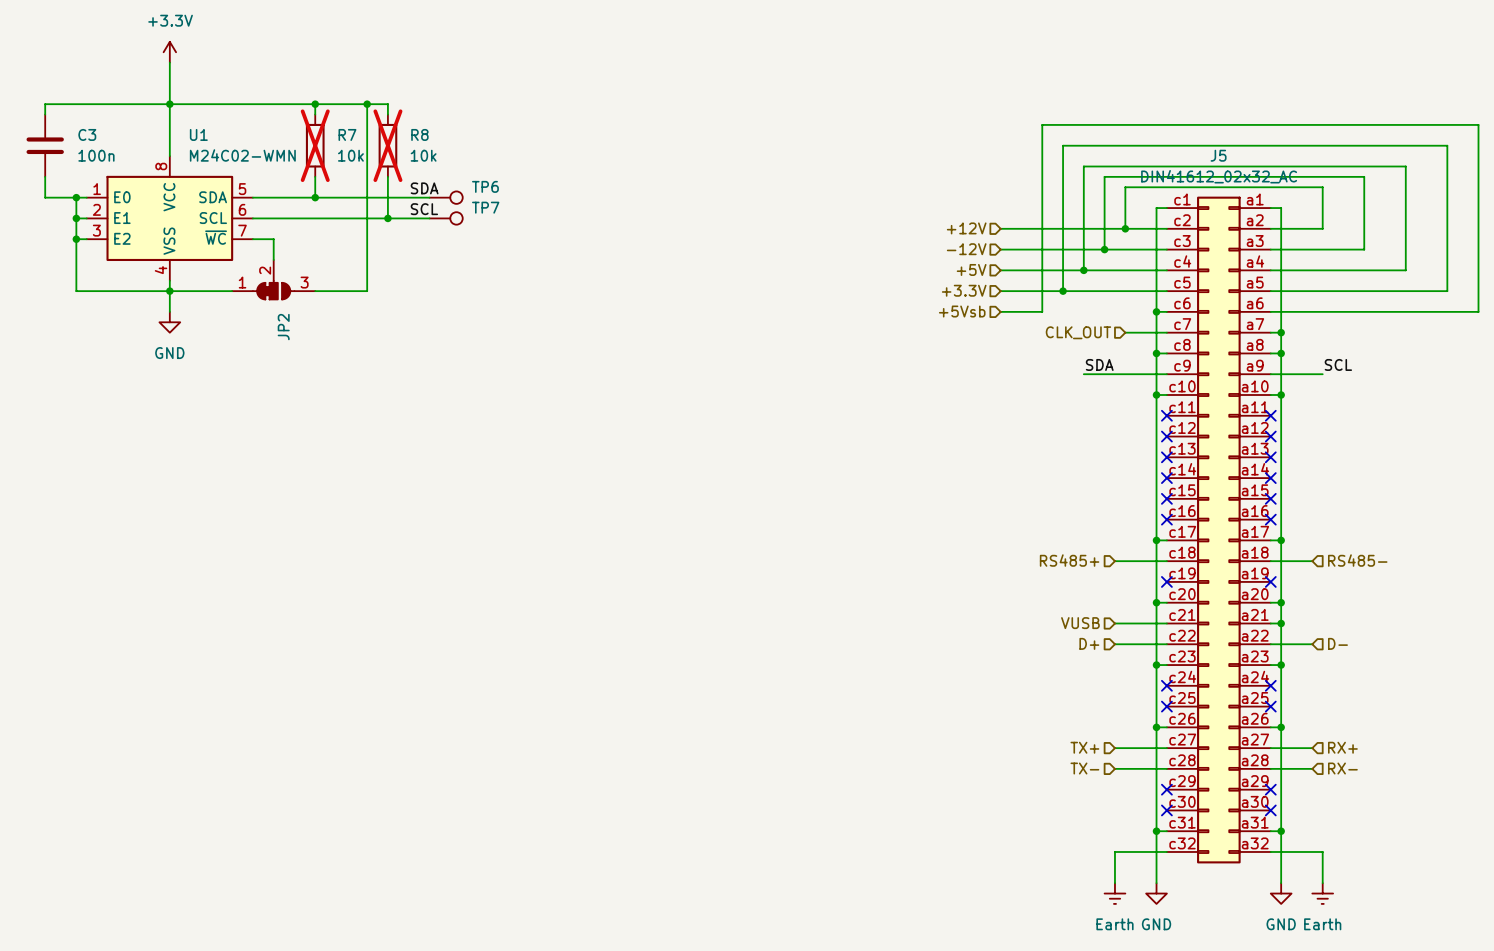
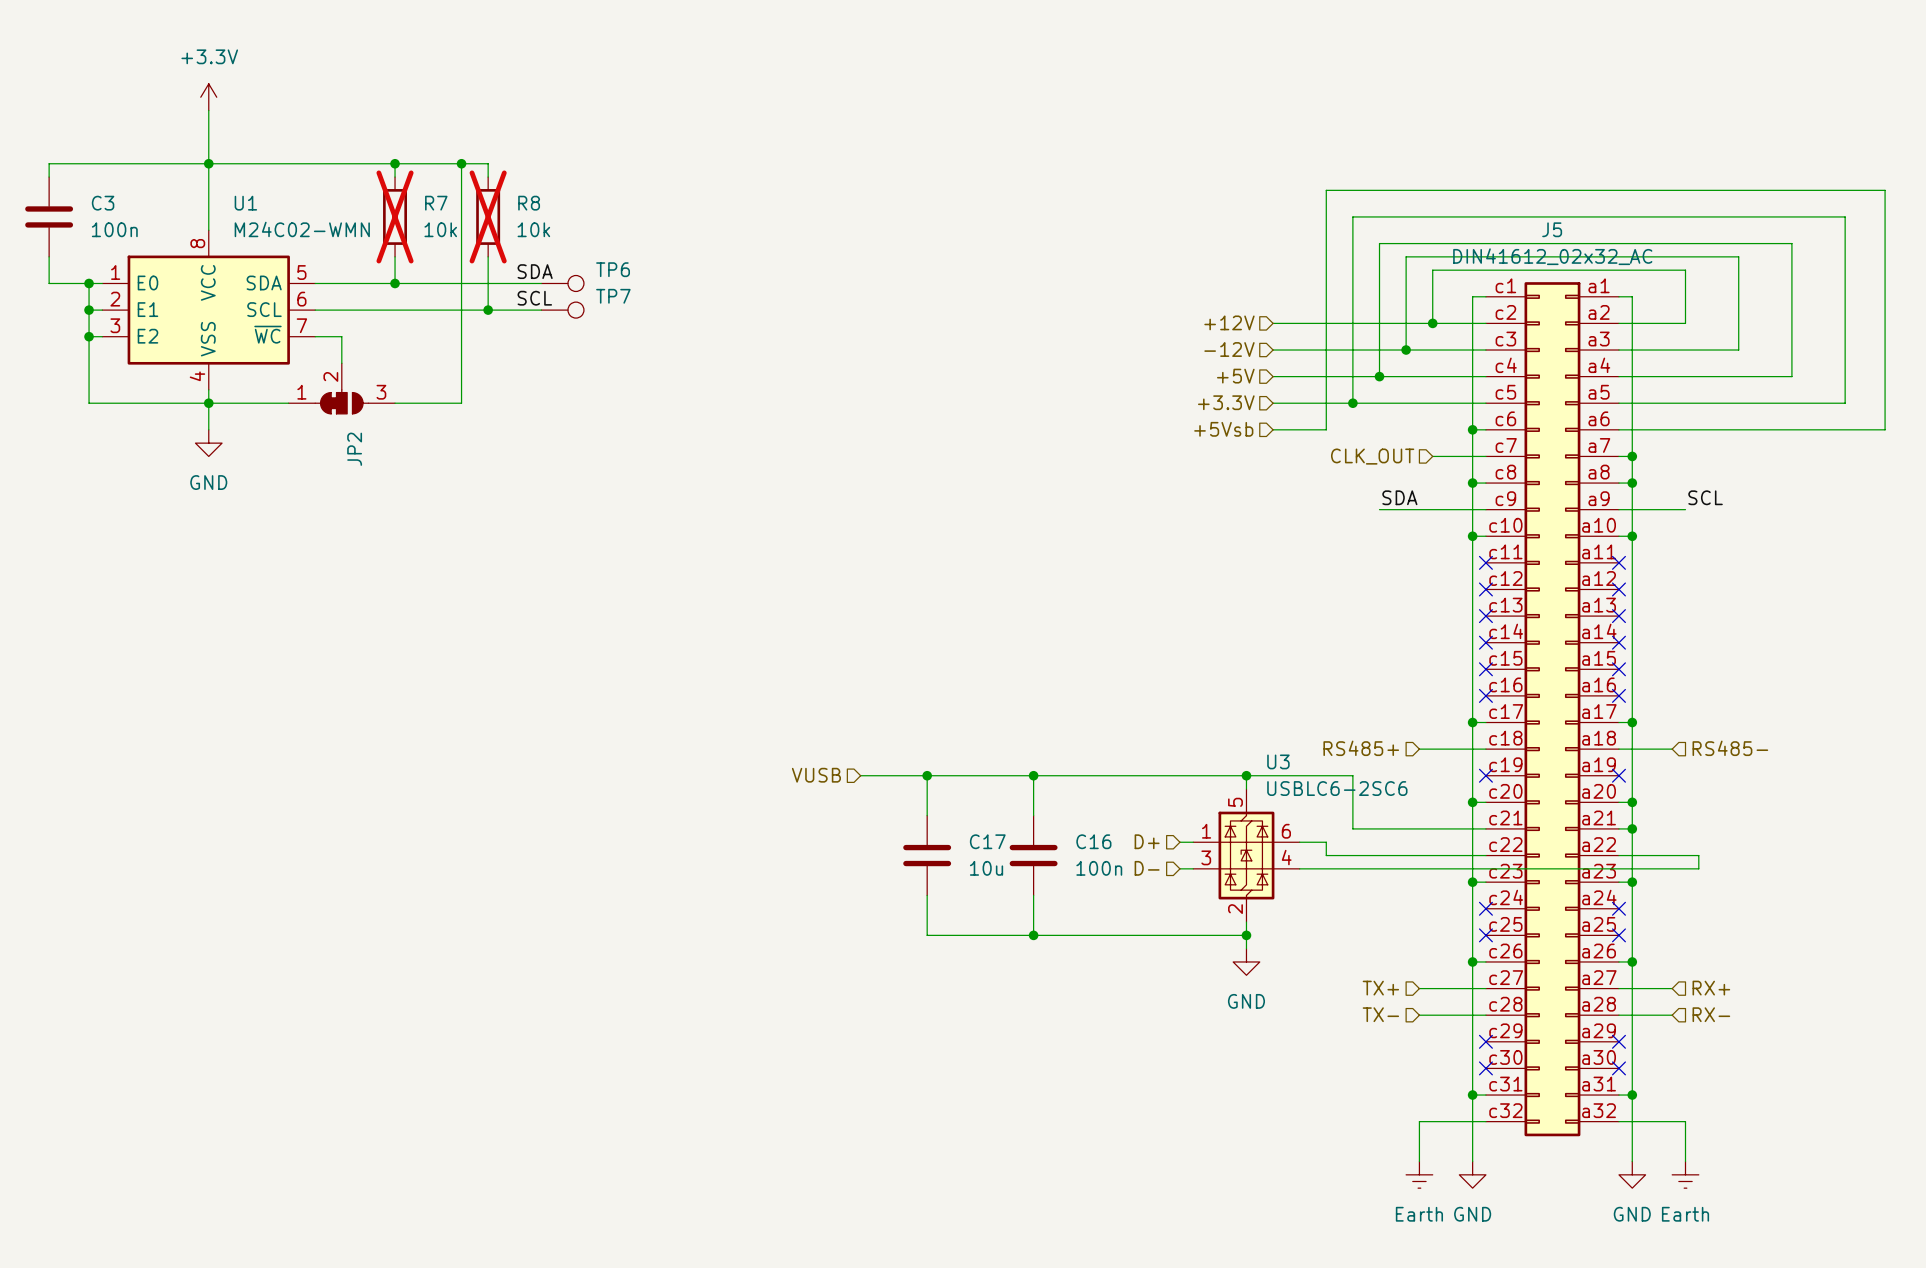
hierarchical label: none -> VUSB (816, 775)
wire: none -> (860, 775) (1352, 775) (1352, 828) (1419, 828)
wire: none -> (927, 775) (927, 815)
junction: none -> (927, 775)
wire: none -> (1033, 775) (1033, 815)
junction: none -> (1033, 775)
wire: none -> (1246, 775) (1246, 789)
junction: none -> (1246, 775)
hierarchical label: VUSB (1080, 623) -> none
wire: none -> (1179, 842) (1193, 842)
wire: none -> (1299, 842) (1326, 842) (1326, 855) (1419, 855)
hierarchical label position: D+ (1089, 643) -> D+ (1147, 841)
hierarchical label: D- (1337, 643) -> none
C17: none -> 10u (927, 855)
C16: none -> 100n (1033, 855)
U3: none -> USBLC6-2SC6 (1246, 855)
wire: none -> (1672, 855) (1698, 855) (1698, 868) (1299, 868)
hierarchical label: none -> D- (1147, 868)
wire: none -> (1179, 868) (1193, 868)
wire: none -> (927, 895) (927, 935) (1246, 935)
wire: none -> (1033, 895) (1033, 935)
wire: none -> (1246, 922) (1246, 948)
junction: none -> (1033, 935)
junction: none -> (1246, 935)
power symbol: none -> GND (1246, 961)

